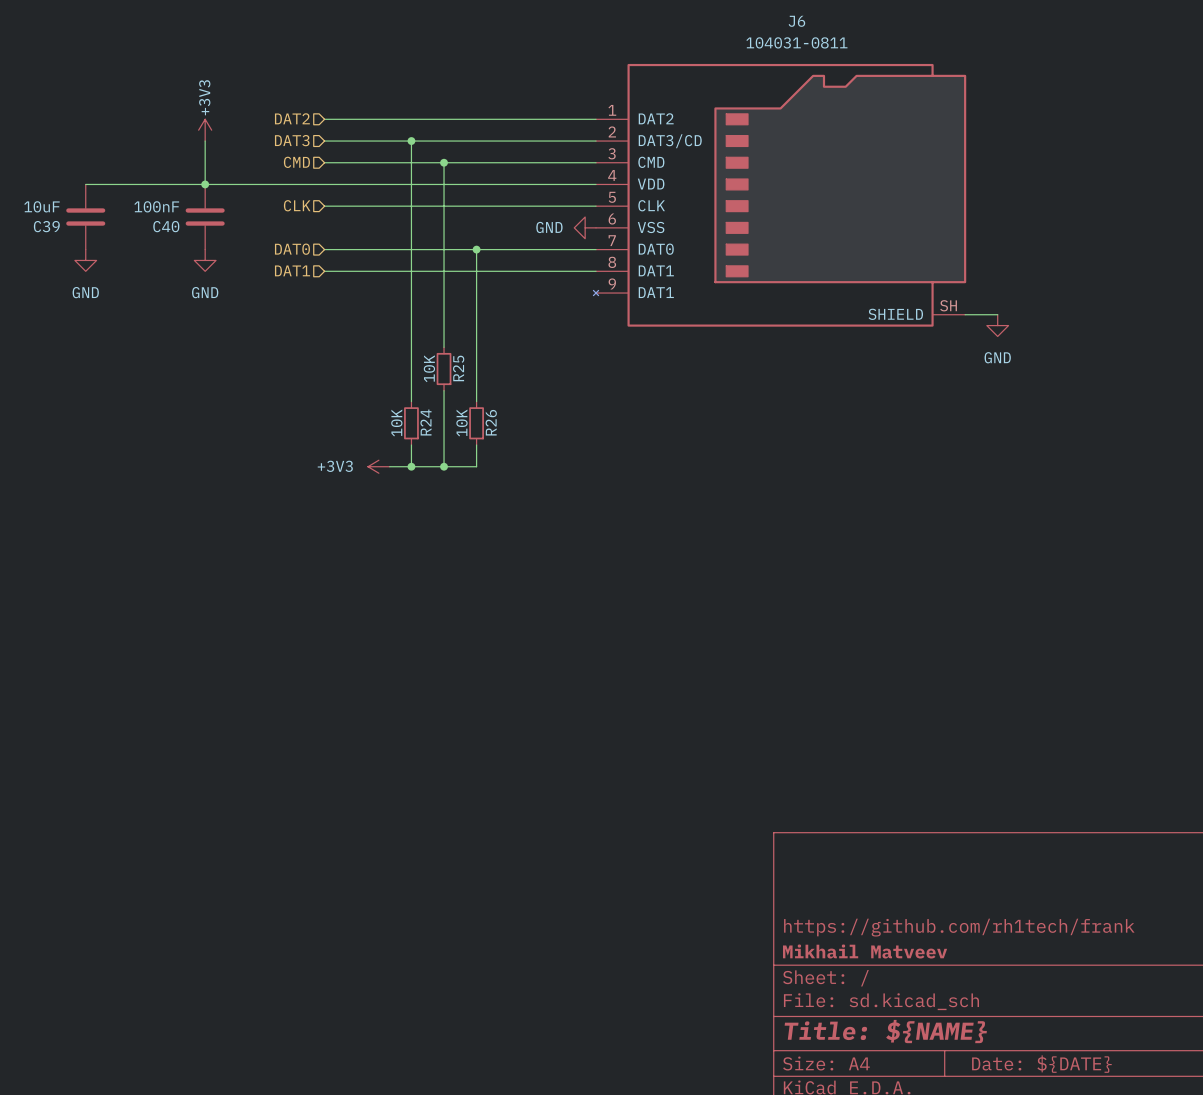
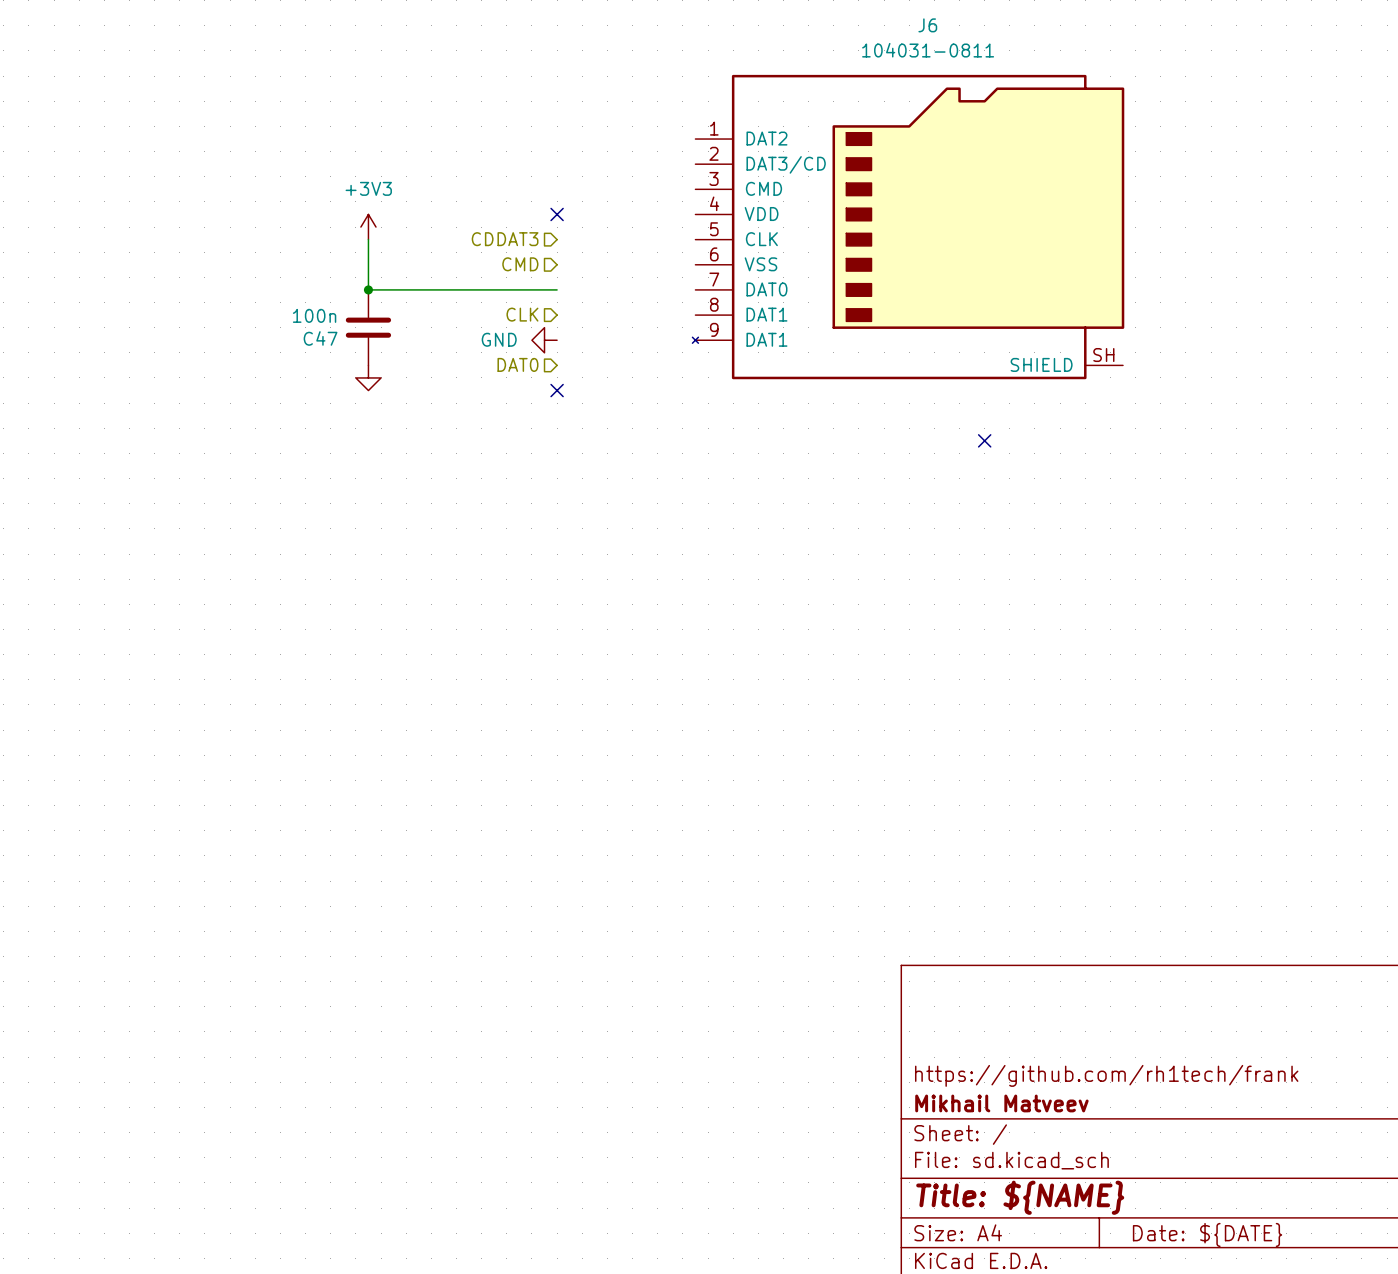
power symbol text rotation: 0° (204, 97) -> 90° clockwise (368, 188)
hierarchical label: DAT2 (292, 118) -> none
wire: (324, 119) (596, 119) -> none
power symbol position: +3V3 (205, 130) -> +3V3 (368, 227)
hierarchical label: DAT3 (292, 140) -> none
wire: (205, 141) (205, 184) -> none
wire: (324, 141) (596, 141) -> none
wire: (411, 141) (411, 401) -> none
junction: (411, 141) -> none
hierarchical label position: CMD (296, 162) -> CMD (520, 264)
wire: (324, 162) (596, 162) -> none
wire: (444, 162) (444, 347) -> none
junction: (444, 162) -> none
wire: (85, 184) (596, 184) -> none
junction: (205, 184) -> none
no-connect mark: none -> (557, 214)
hierarchical label position: CLK (297, 205) -> CLK (522, 314)
hierarchical label: none -> CDDAT3 (505, 239)
wire: none -> (368, 239) (368, 289) (381, 289)
wire: (324, 206) (596, 206) -> none
C39: 10uF (85, 217) -> none
C40: 100nF (205, 217) -> none
power symbol: GND (585, 227) -> none
hierarchical label position: DAT0 (292, 249) -> DAT0 (517, 364)
junction: none -> (368, 289)
junction: (476, 249) -> none
wire: (596, 249) (476, 249) (476, 401) -> none
power symbol: GND (85, 260) -> none
power symbol: GND (205, 260) -> none
hierarchical label: DAT1 (292, 270) -> none
wire: (324, 271) (596, 271) -> none
C47: none -> 100n (368, 327)
power symbol: none -> GND (544, 340)
wire: (965, 314) (997, 314) -> none
power symbol: none -> (368, 377)
power symbol: GND (997, 325) -> none
no-connect mark: none -> (557, 390)
R25: 10K (444, 369) -> none
no-connect mark: none -> (984, 440)
wire: (444, 390) (444, 466) -> none
R24: 10K (411, 423) -> none
R26: 10K (476, 423) -> none
wire: (411, 445) (411, 466) -> none
wire: (476, 445) (476, 466) (389, 466) -> none
power symbol: +3V3 (378, 466) -> none
junction: (411, 466) -> none
junction: (444, 466) -> none

